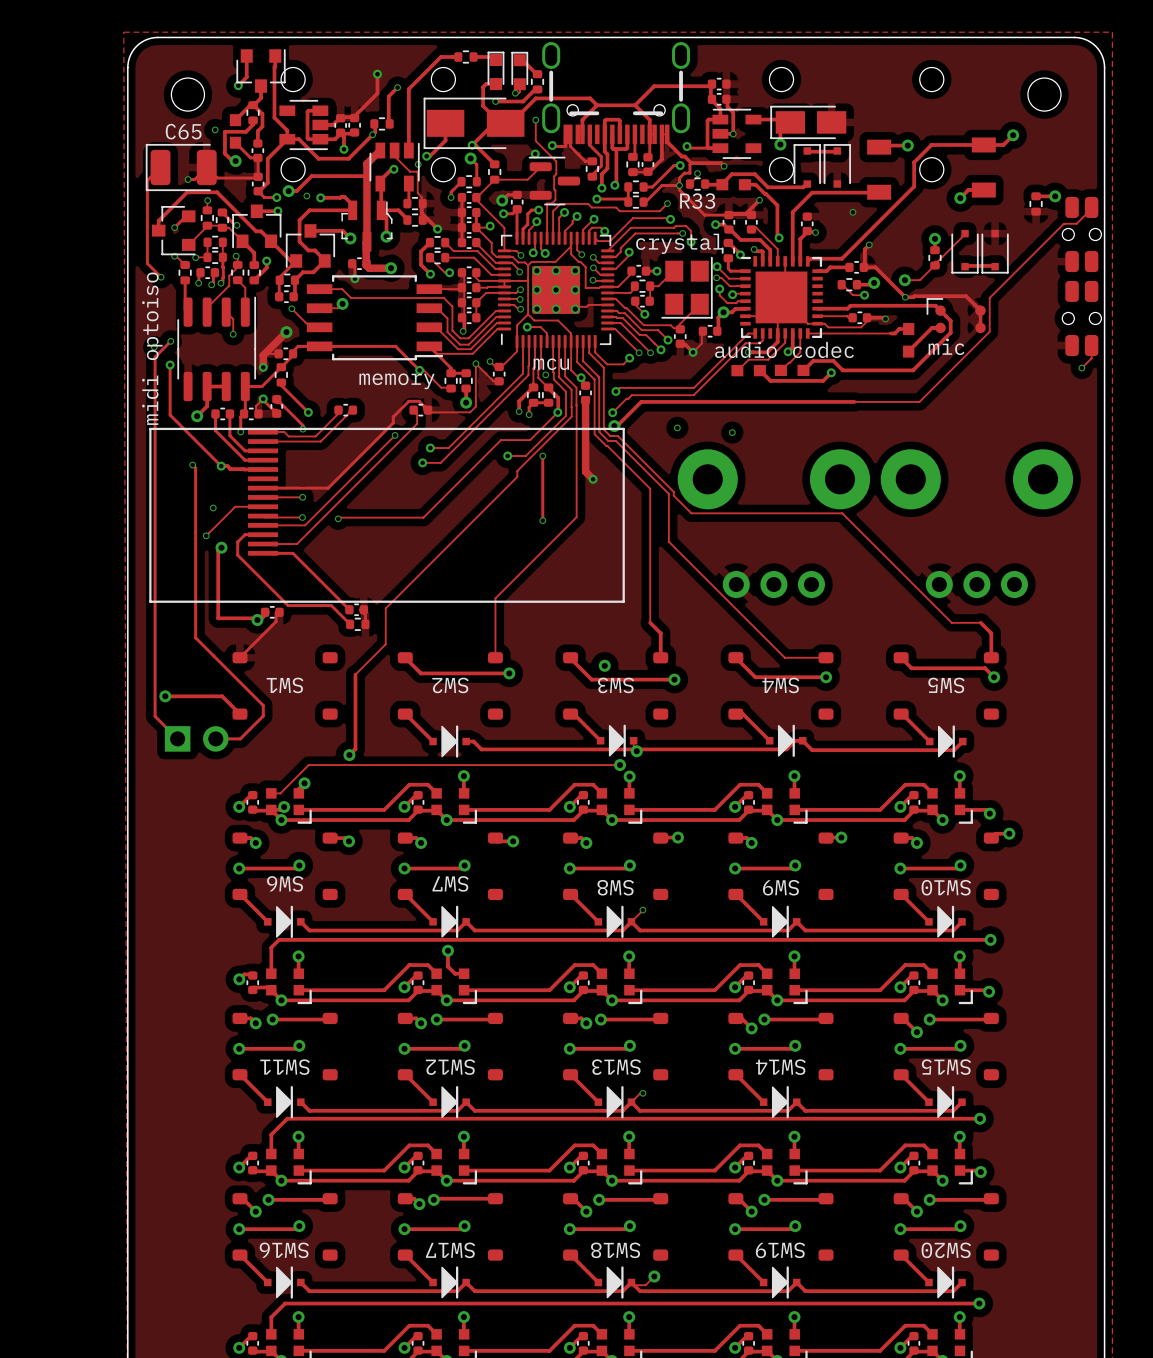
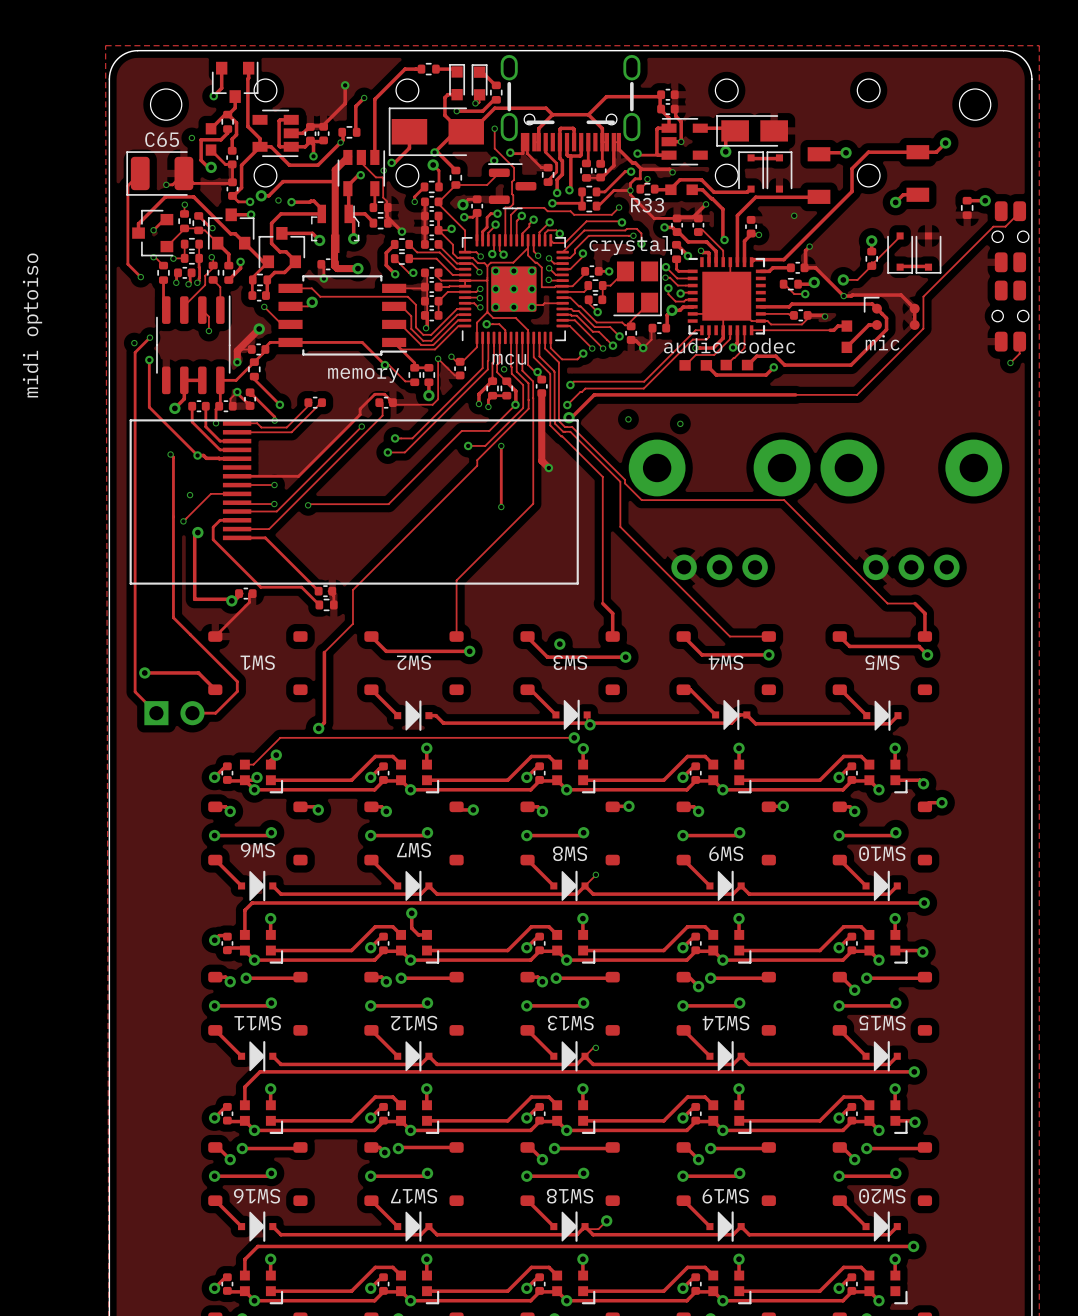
text position: midi optoiso (152, 348) -> midi optoiso (32, 325)

